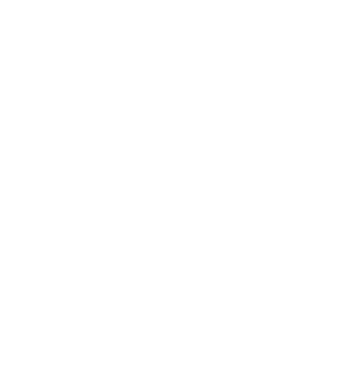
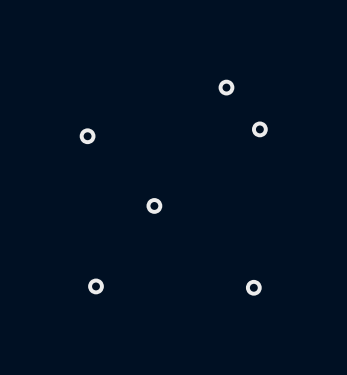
via: none -> (226, 87)
via: none -> (259, 129)
via: none -> (87, 136)
via: none -> (154, 205)
via: none -> (95, 286)
via: none -> (253, 287)

